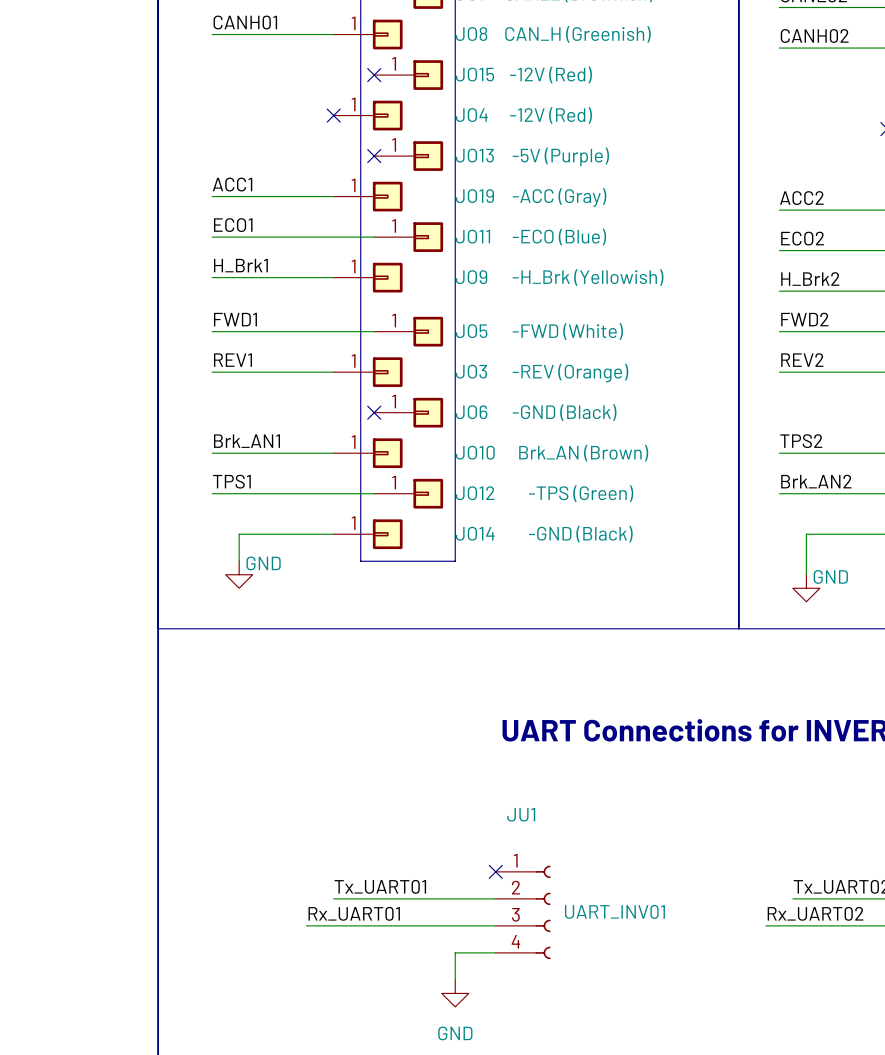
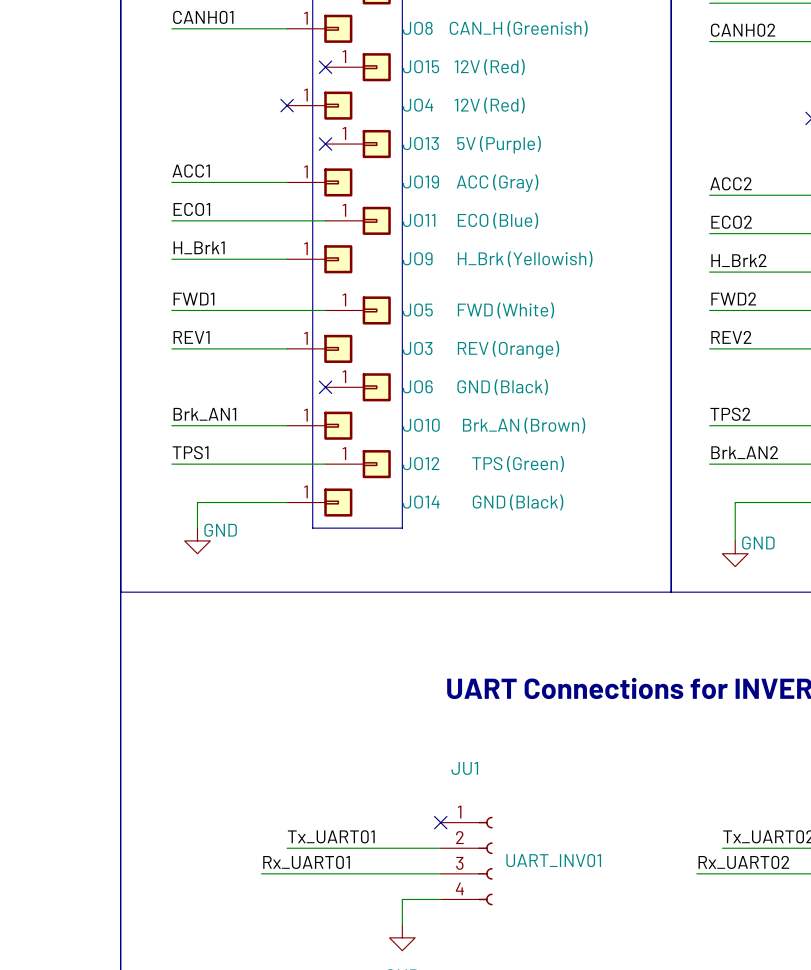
JO15 value: -12V (Red) (551, 74) -> 12V (Red) (489, 67)
JO4 value: -12V (Red) (551, 115) -> 12V (Red) (489, 105)
JO13 value: -5V (Purple) (560, 156) -> 5V (Purple) (499, 144)
JO19 value: -ACC (Gray) (559, 197) -> ACC (Gray) (497, 183)
JO11 value: -ECO (Blue) (559, 237) -> ECO (Blue) (498, 220)
JO9 value: -H_Brk (Yellowish) (588, 277) -> H_Brk (Yellowish) (525, 259)
JO5 value: -FWD (White) (567, 331) -> FWD (White) (505, 310)
JO3 value: -REV (Orange) (570, 372) -> REV (Orange) (508, 349)
JO6 value: -GND (Black) (564, 412) -> GND (Black) (502, 387)
JO12 value: -TPS (Green) (581, 493) -> TPS (Green) (518, 464)
JO14 value: -GND (Black) (580, 534) -> GND (Black) (518, 502)

